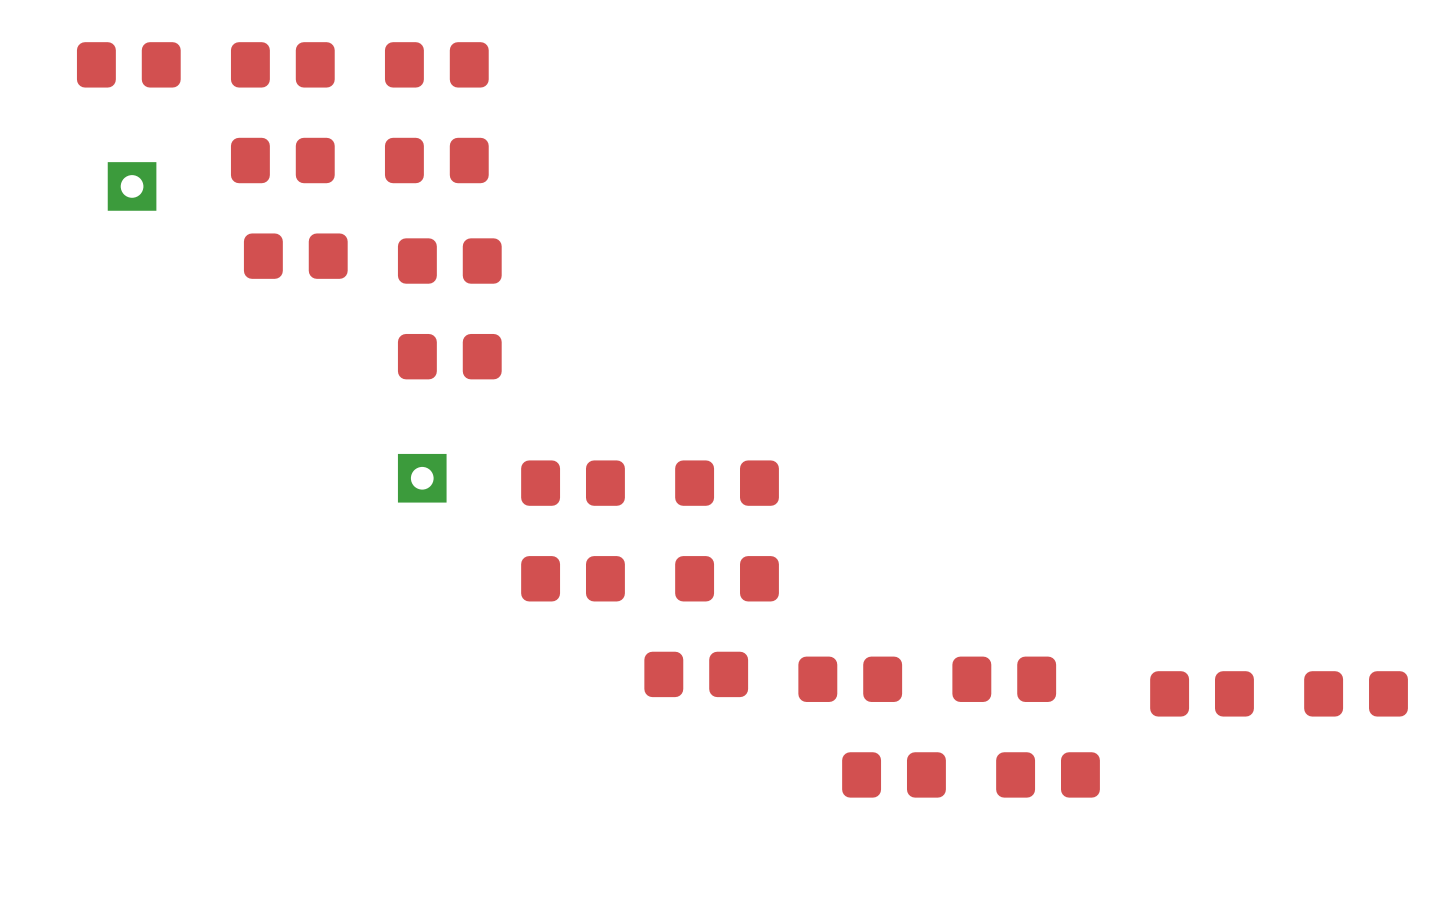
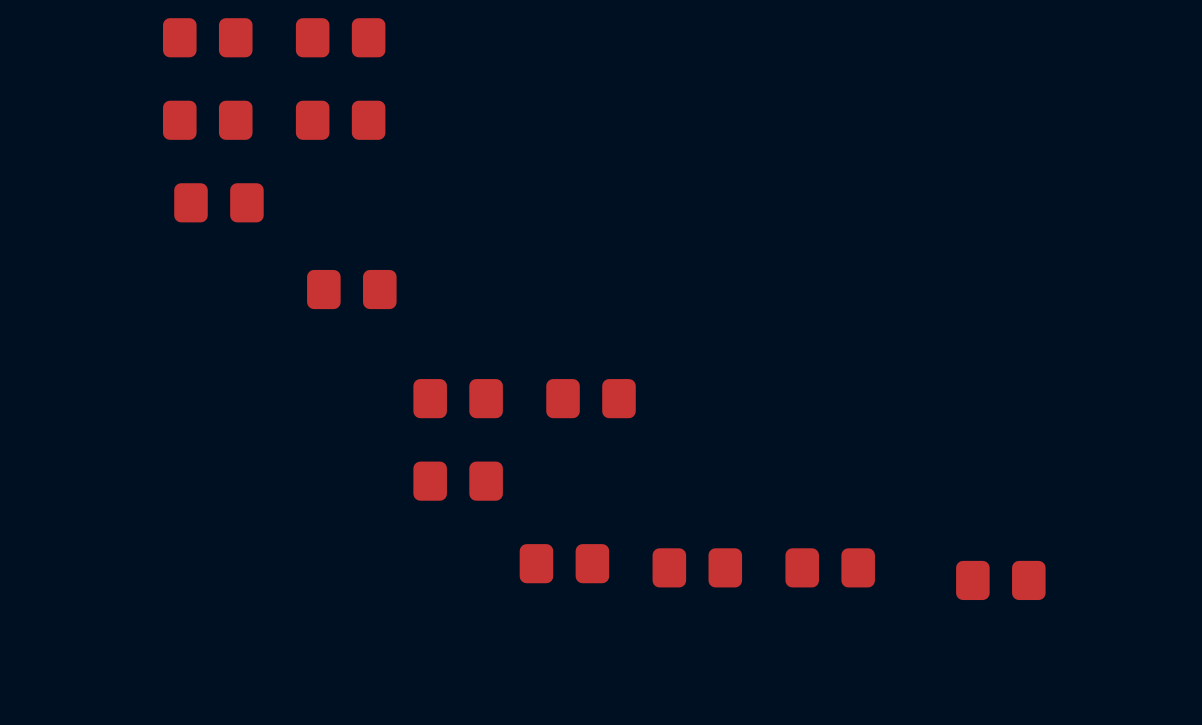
part: (128, 64) -> none
part: (132, 186) -> none
part: (449, 261) -> none
part: (422, 478) -> none
part: (727, 578) -> none
part: (1356, 693) -> none
part: (894, 774) -> none
part: (1048, 774) -> none

